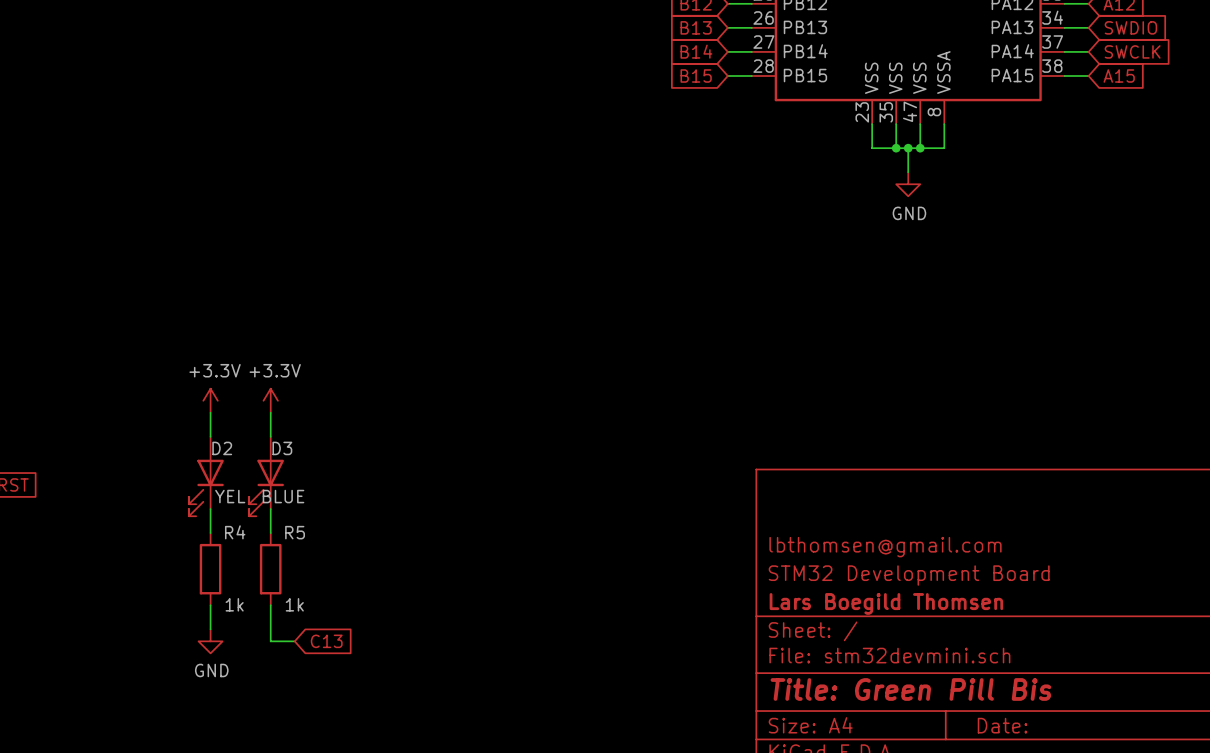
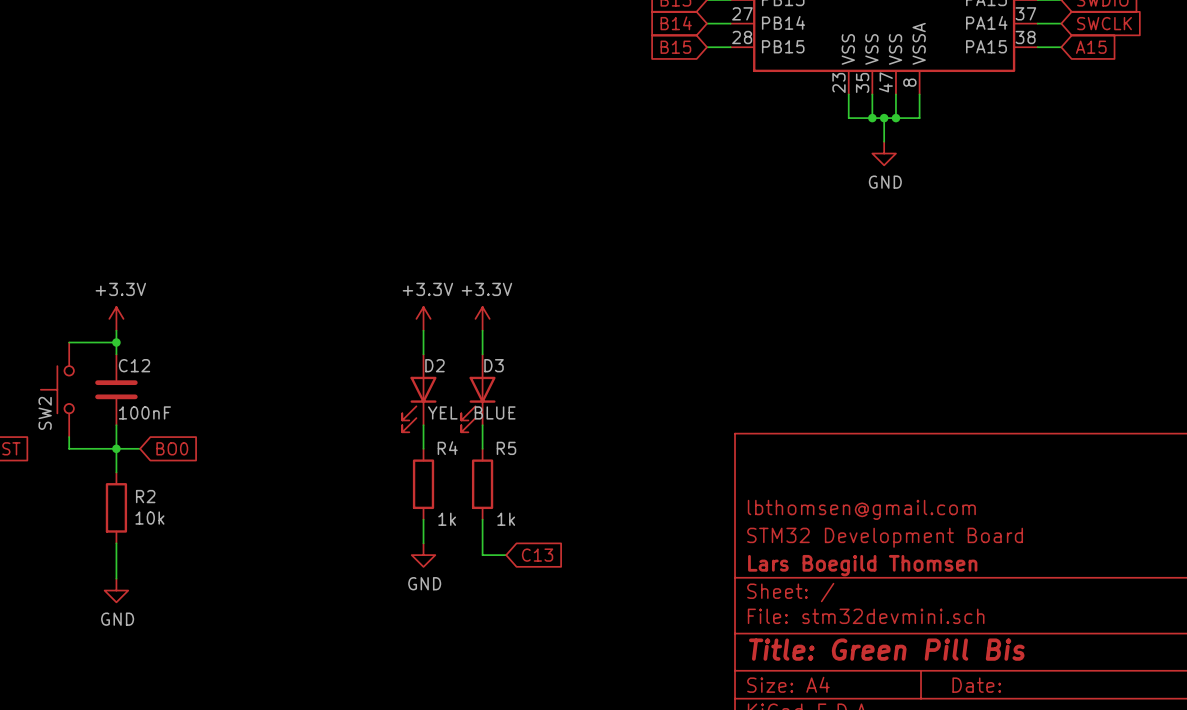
power symbol: none -> +3.3V (116, 318)
power symbol: none -> +3.3V (423, 318)
power symbol: none -> +3.3V (482, 318)
wire: none -> (116, 330) (116, 354)
wire: none -> (69, 342) (116, 342)
junction: none -> (116, 342)
power symbol: +3.3V (210, 400) -> none
power symbol: +3.3V (270, 400) -> none
wire: (210, 412) (210, 436) -> (423, 330) (423, 354)
wire: (270, 412) (270, 436) -> (482, 330) (482, 354)
SW2: none -> (57, 389)
C12: none -> 100nF (116, 389)
wire: none -> (116, 425) (116, 472)
wire: none -> (69, 437) (69, 448) (140, 448)
D2 position: (206, 476) -> (419, 393)
D3 position: (266, 476) -> (478, 393)
junction: none -> (116, 448)
global label: none -> BO0 (172, 448)
wire: (210, 509) (210, 533) -> (423, 425) (423, 448)
wire: (270, 509) (270, 533) -> (482, 425) (482, 448)
R2: none -> 10k (116, 507)
R4 position: (210, 569) -> (423, 484)
R5 position: (270, 569) -> (482, 484)
wire: none -> (116, 543) (116, 578)
power symbol: none -> GND (423, 555)
wire: (210, 605) (210, 629) -> (423, 519) (423, 543)
wire: (270, 605) (270, 641) (294, 641) -> (482, 519) (482, 555) (506, 555)
power symbol position: GND (210, 641) -> GND (116, 590)
global label position: C13 (326, 641) -> C13 (537, 555)

